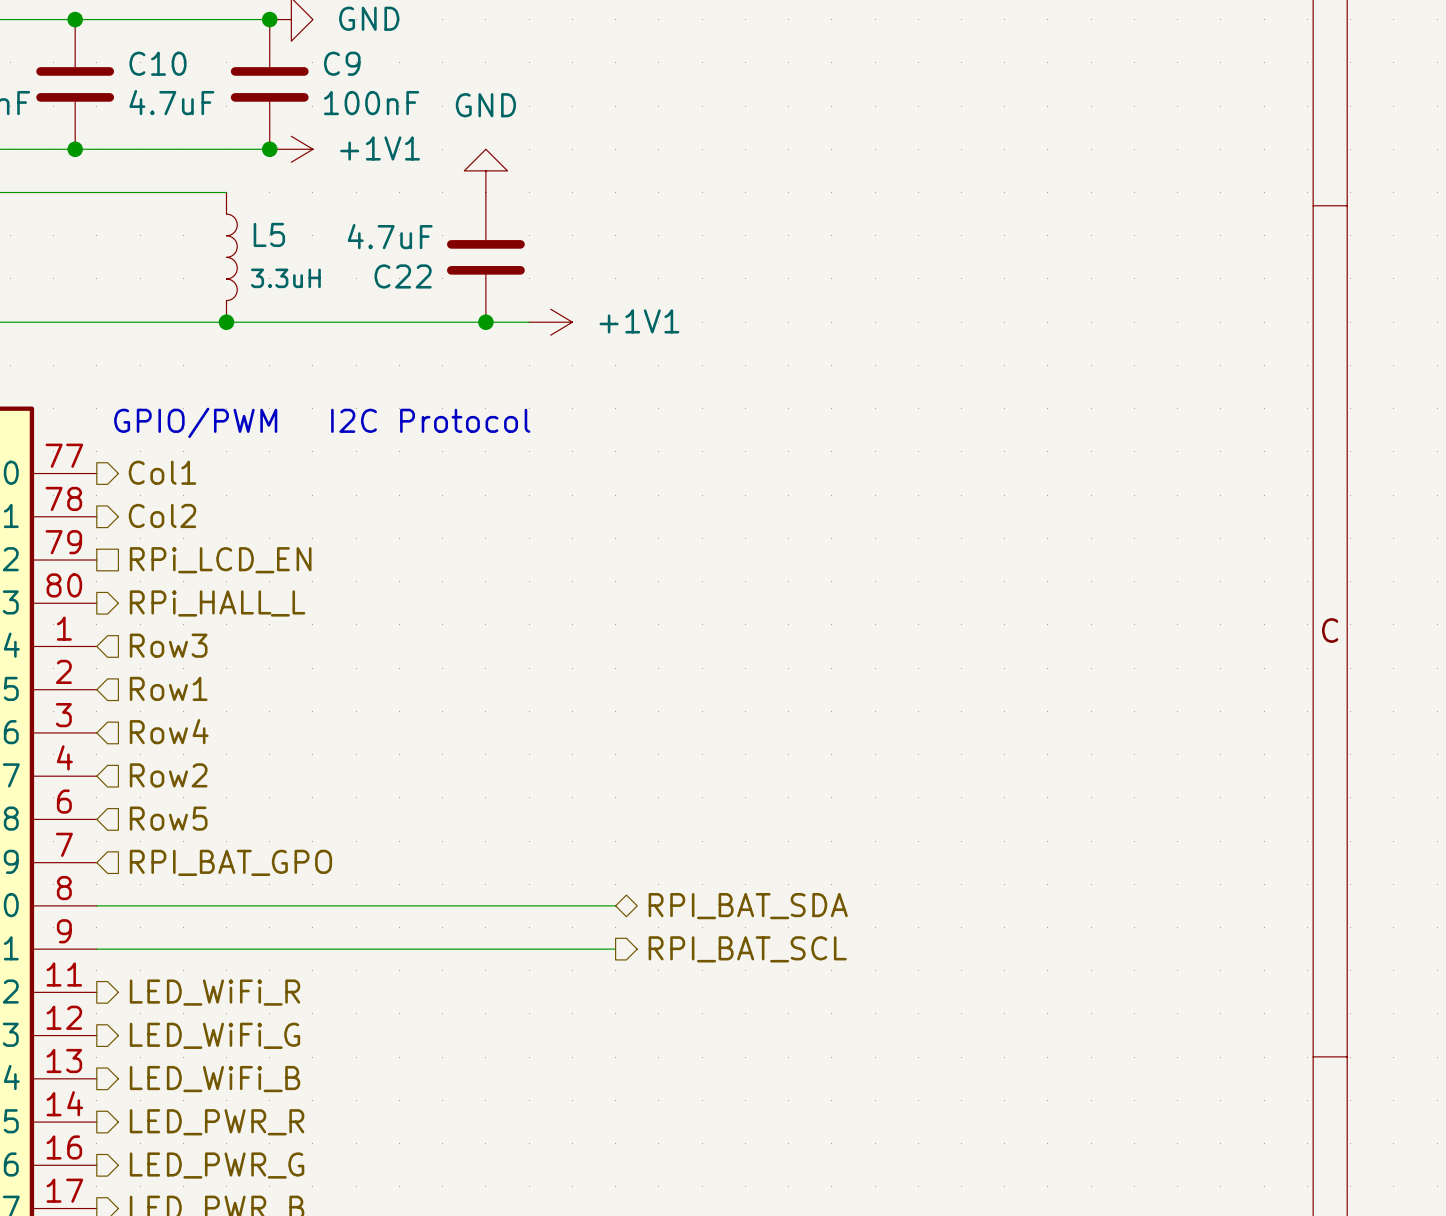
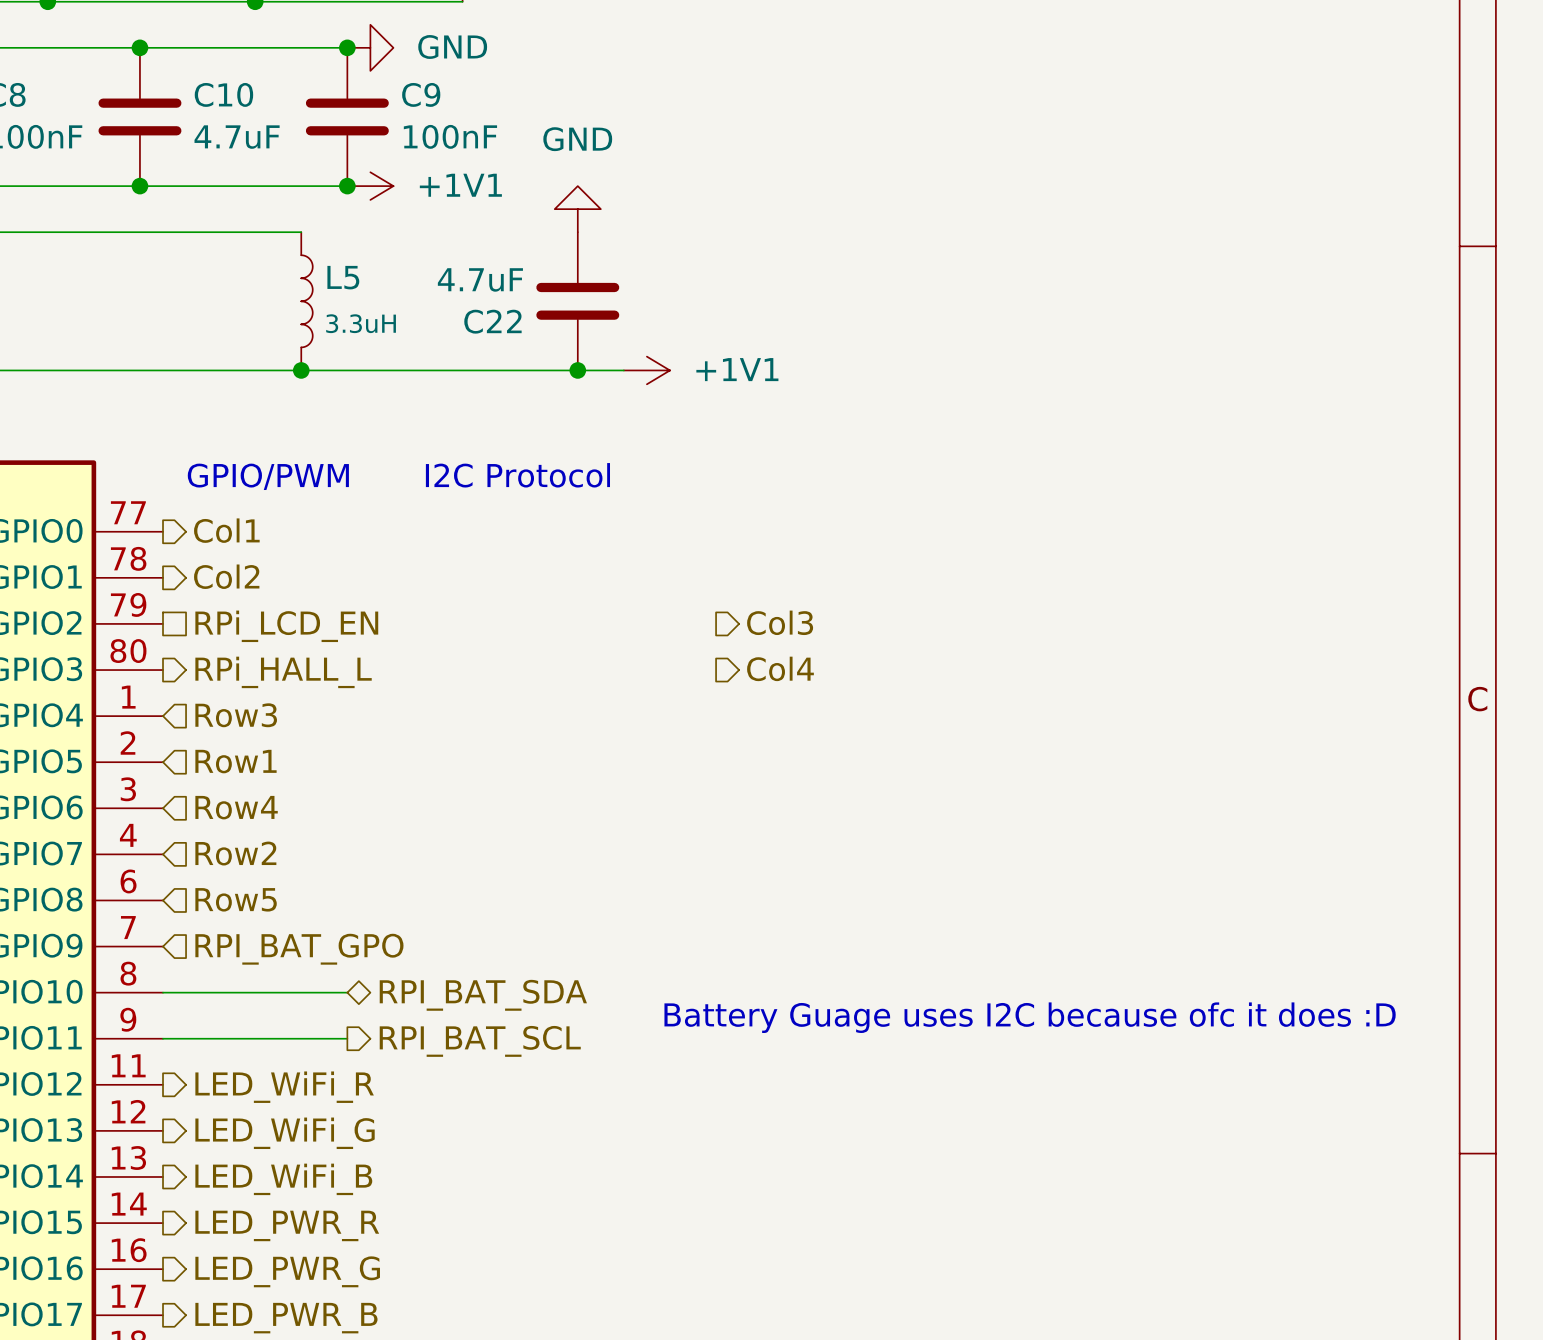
hierarchical label: none -> Col3 (780, 622)
hierarchical label: none -> Col4 (780, 668)
wire: (269, 905) (615, 905) -> none
hierarchical label position: RPI_BAT_SDA (748, 906) -> RPI_BAT_SDA (483, 995)
text: none -> Battery Guage uses I2C because ofc it does :D (1030, 1017)
wire: (269, 949) (615, 949) -> none
hierarchical label position: RPI_BAT_SCL (747, 949) -> RPI_BAT_SCL (480, 1041)

